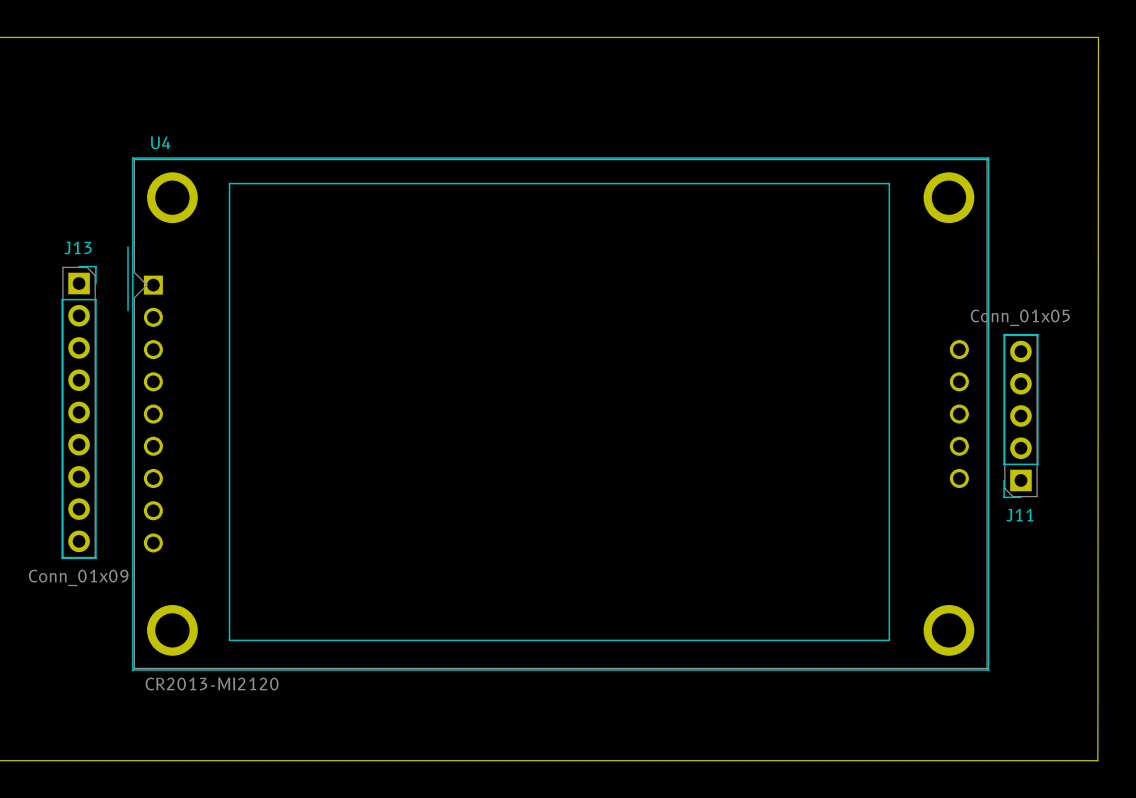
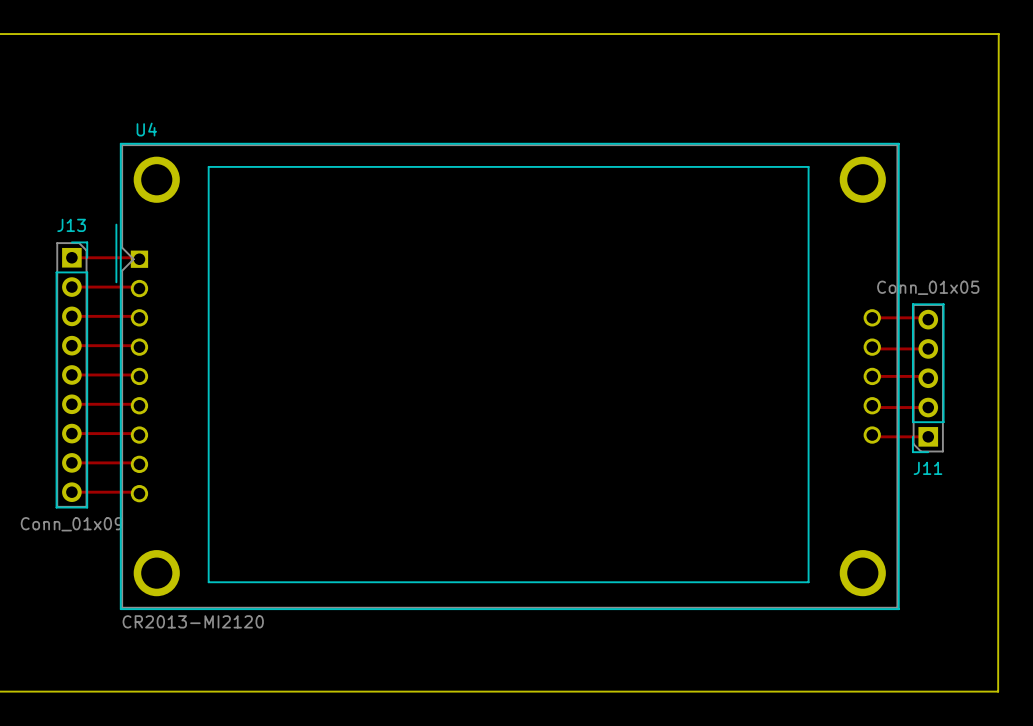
top track: none -> (71, 257) (139, 259)
top track: none -> (71, 287) (139, 288)
top track: none -> (71, 316) (139, 317)
top track: none -> (872, 317) (926, 317) (928, 319)
top track: none -> (71, 345) (139, 347)
top track: none -> (872, 347) (874, 348) (928, 348)
top track: none -> (71, 374) (139, 376)
top track: none -> (872, 376) (926, 376) (928, 378)
top track: none -> (71, 404) (139, 405)
top track: none -> (872, 405) (874, 407) (928, 407)
top track: none -> (71, 433) (139, 435)
top track: none -> (872, 435) (874, 436) (928, 436)
top track: none -> (71, 462) (139, 464)
top track: none -> (71, 492) (139, 493)

